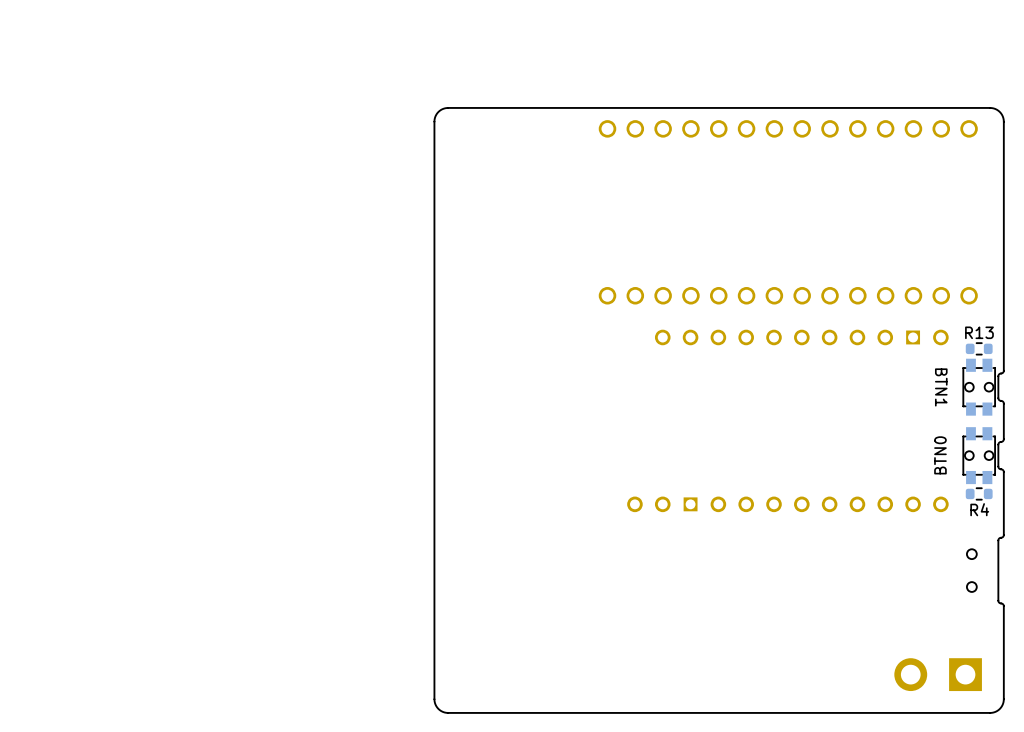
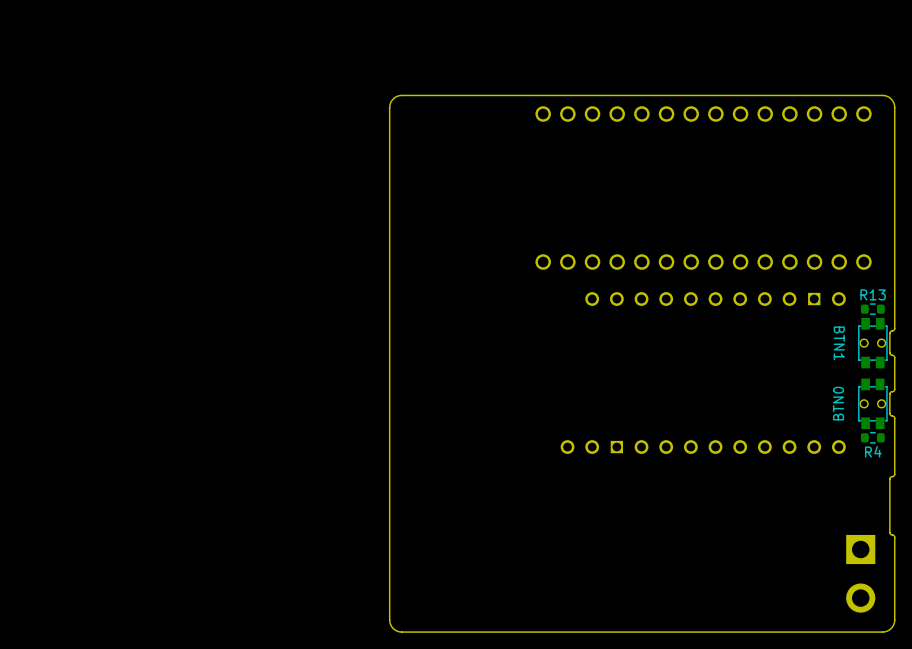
part: (971, 570) -> none
part rotation: 0° (938, 674) -> 90° counterclockwise (860, 573)

